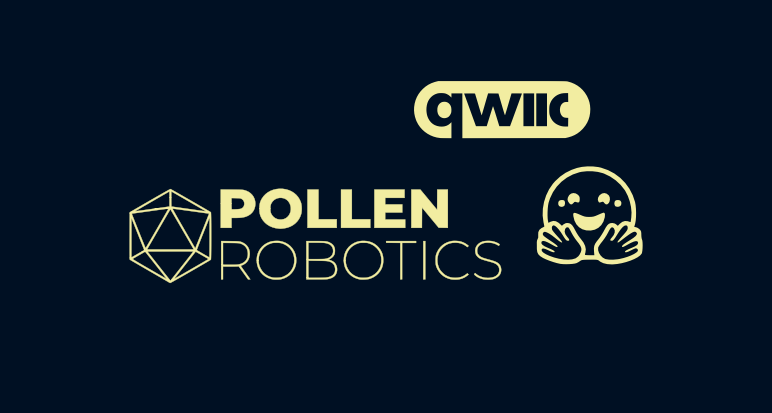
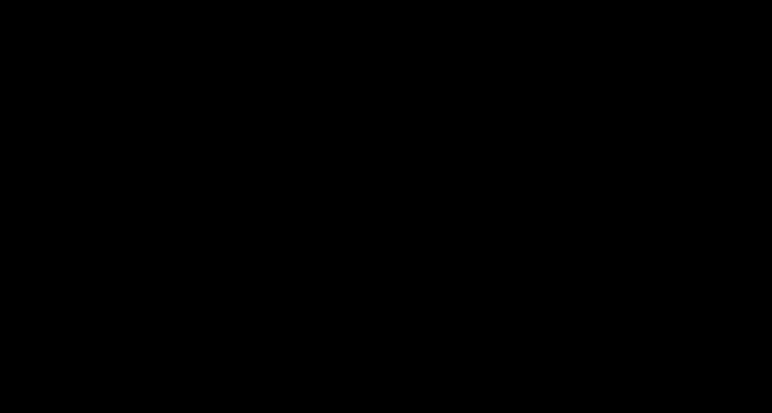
drawing: [129, 81, 643, 284] -> none

